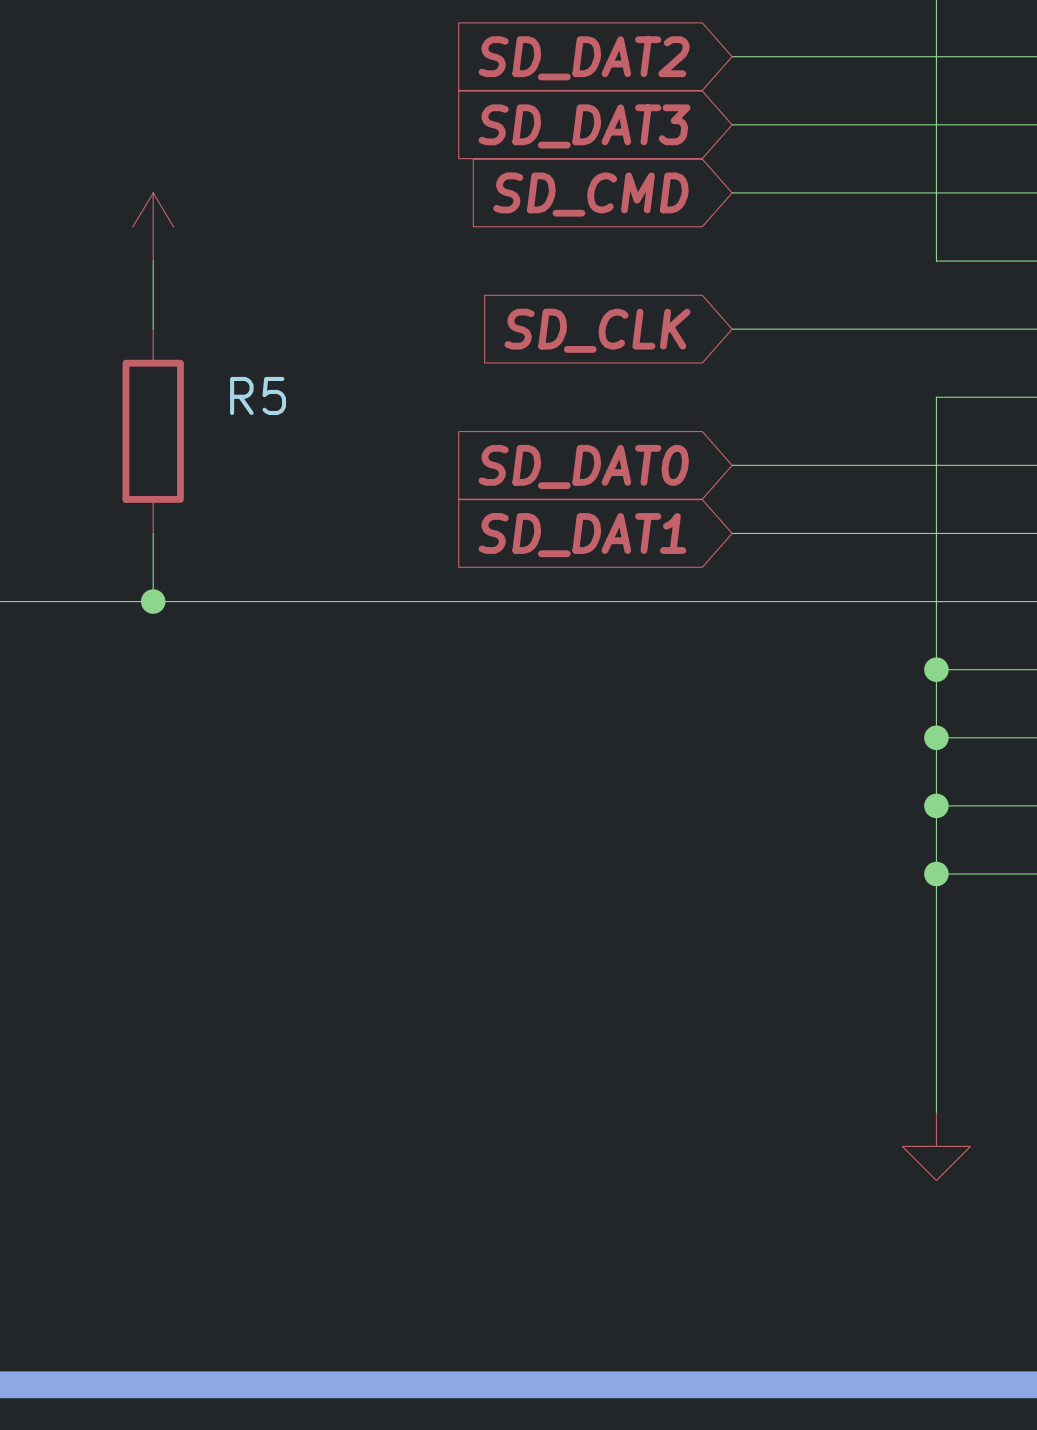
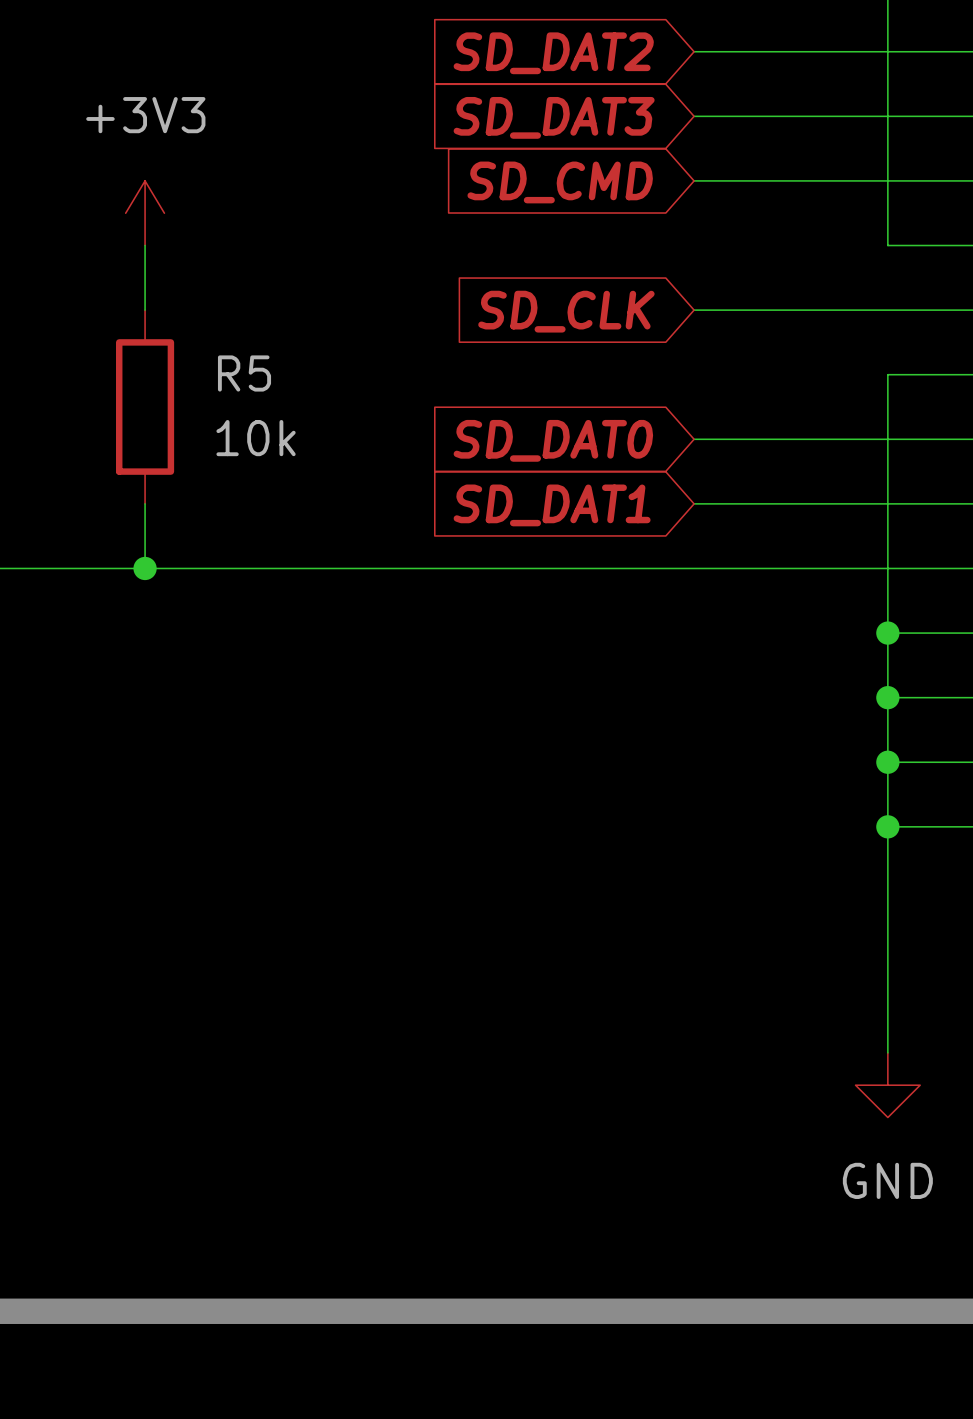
power symbol text: none -> +3V3 (145, 115)
R5 value: none -> 10k (256, 438)
power symbol text: none -> GND (887, 1180)

